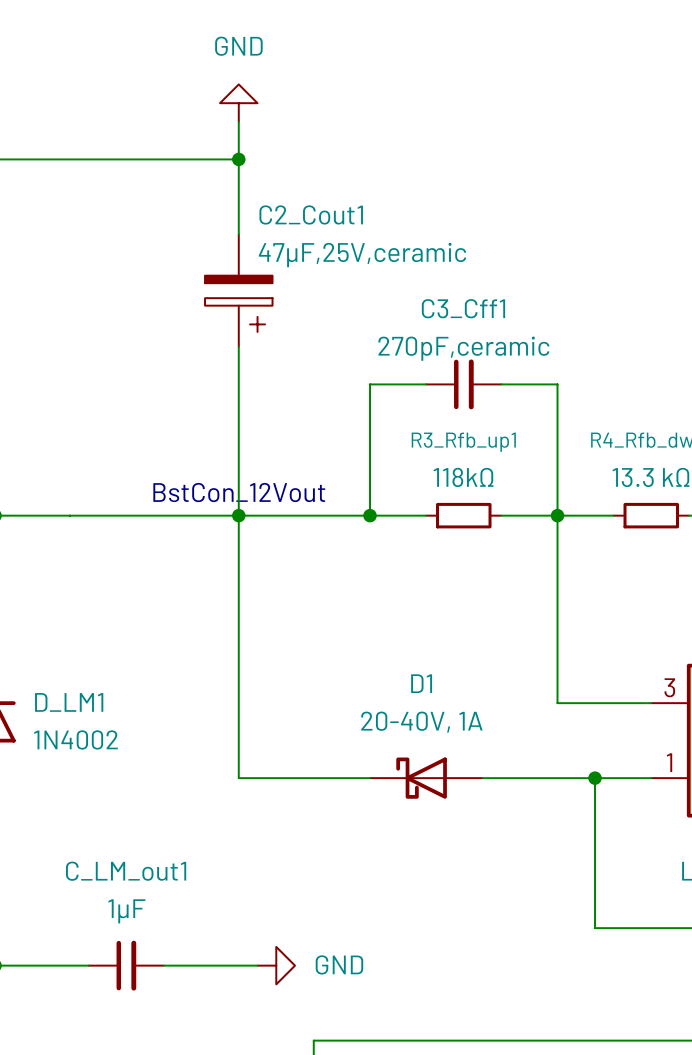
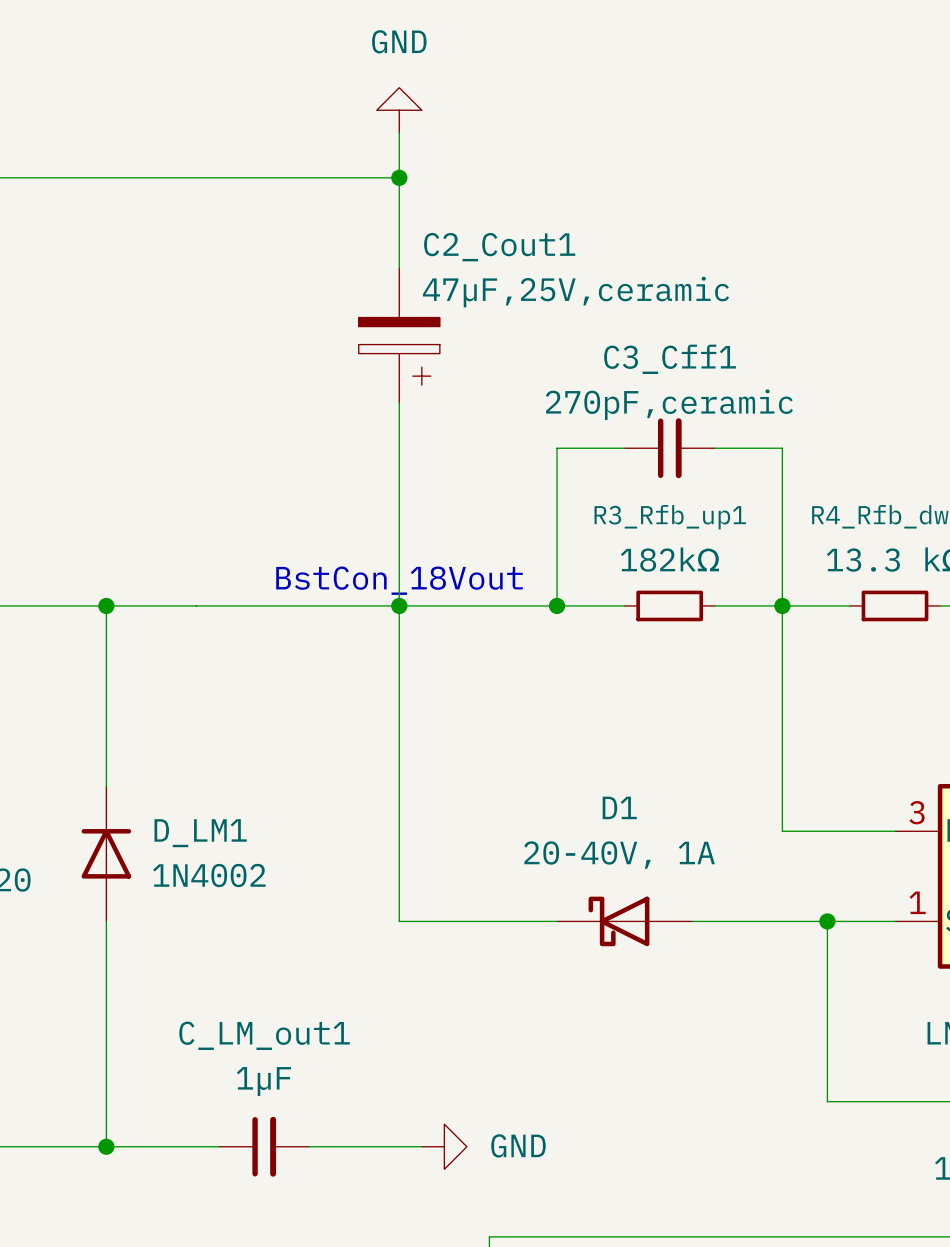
R3_Rfb_up1 value: 118kΩ (463, 477) -> 182kΩ (669, 559)
text: BstCon_12Vout (239, 492) -> BstCon_18Vout (399, 580)

